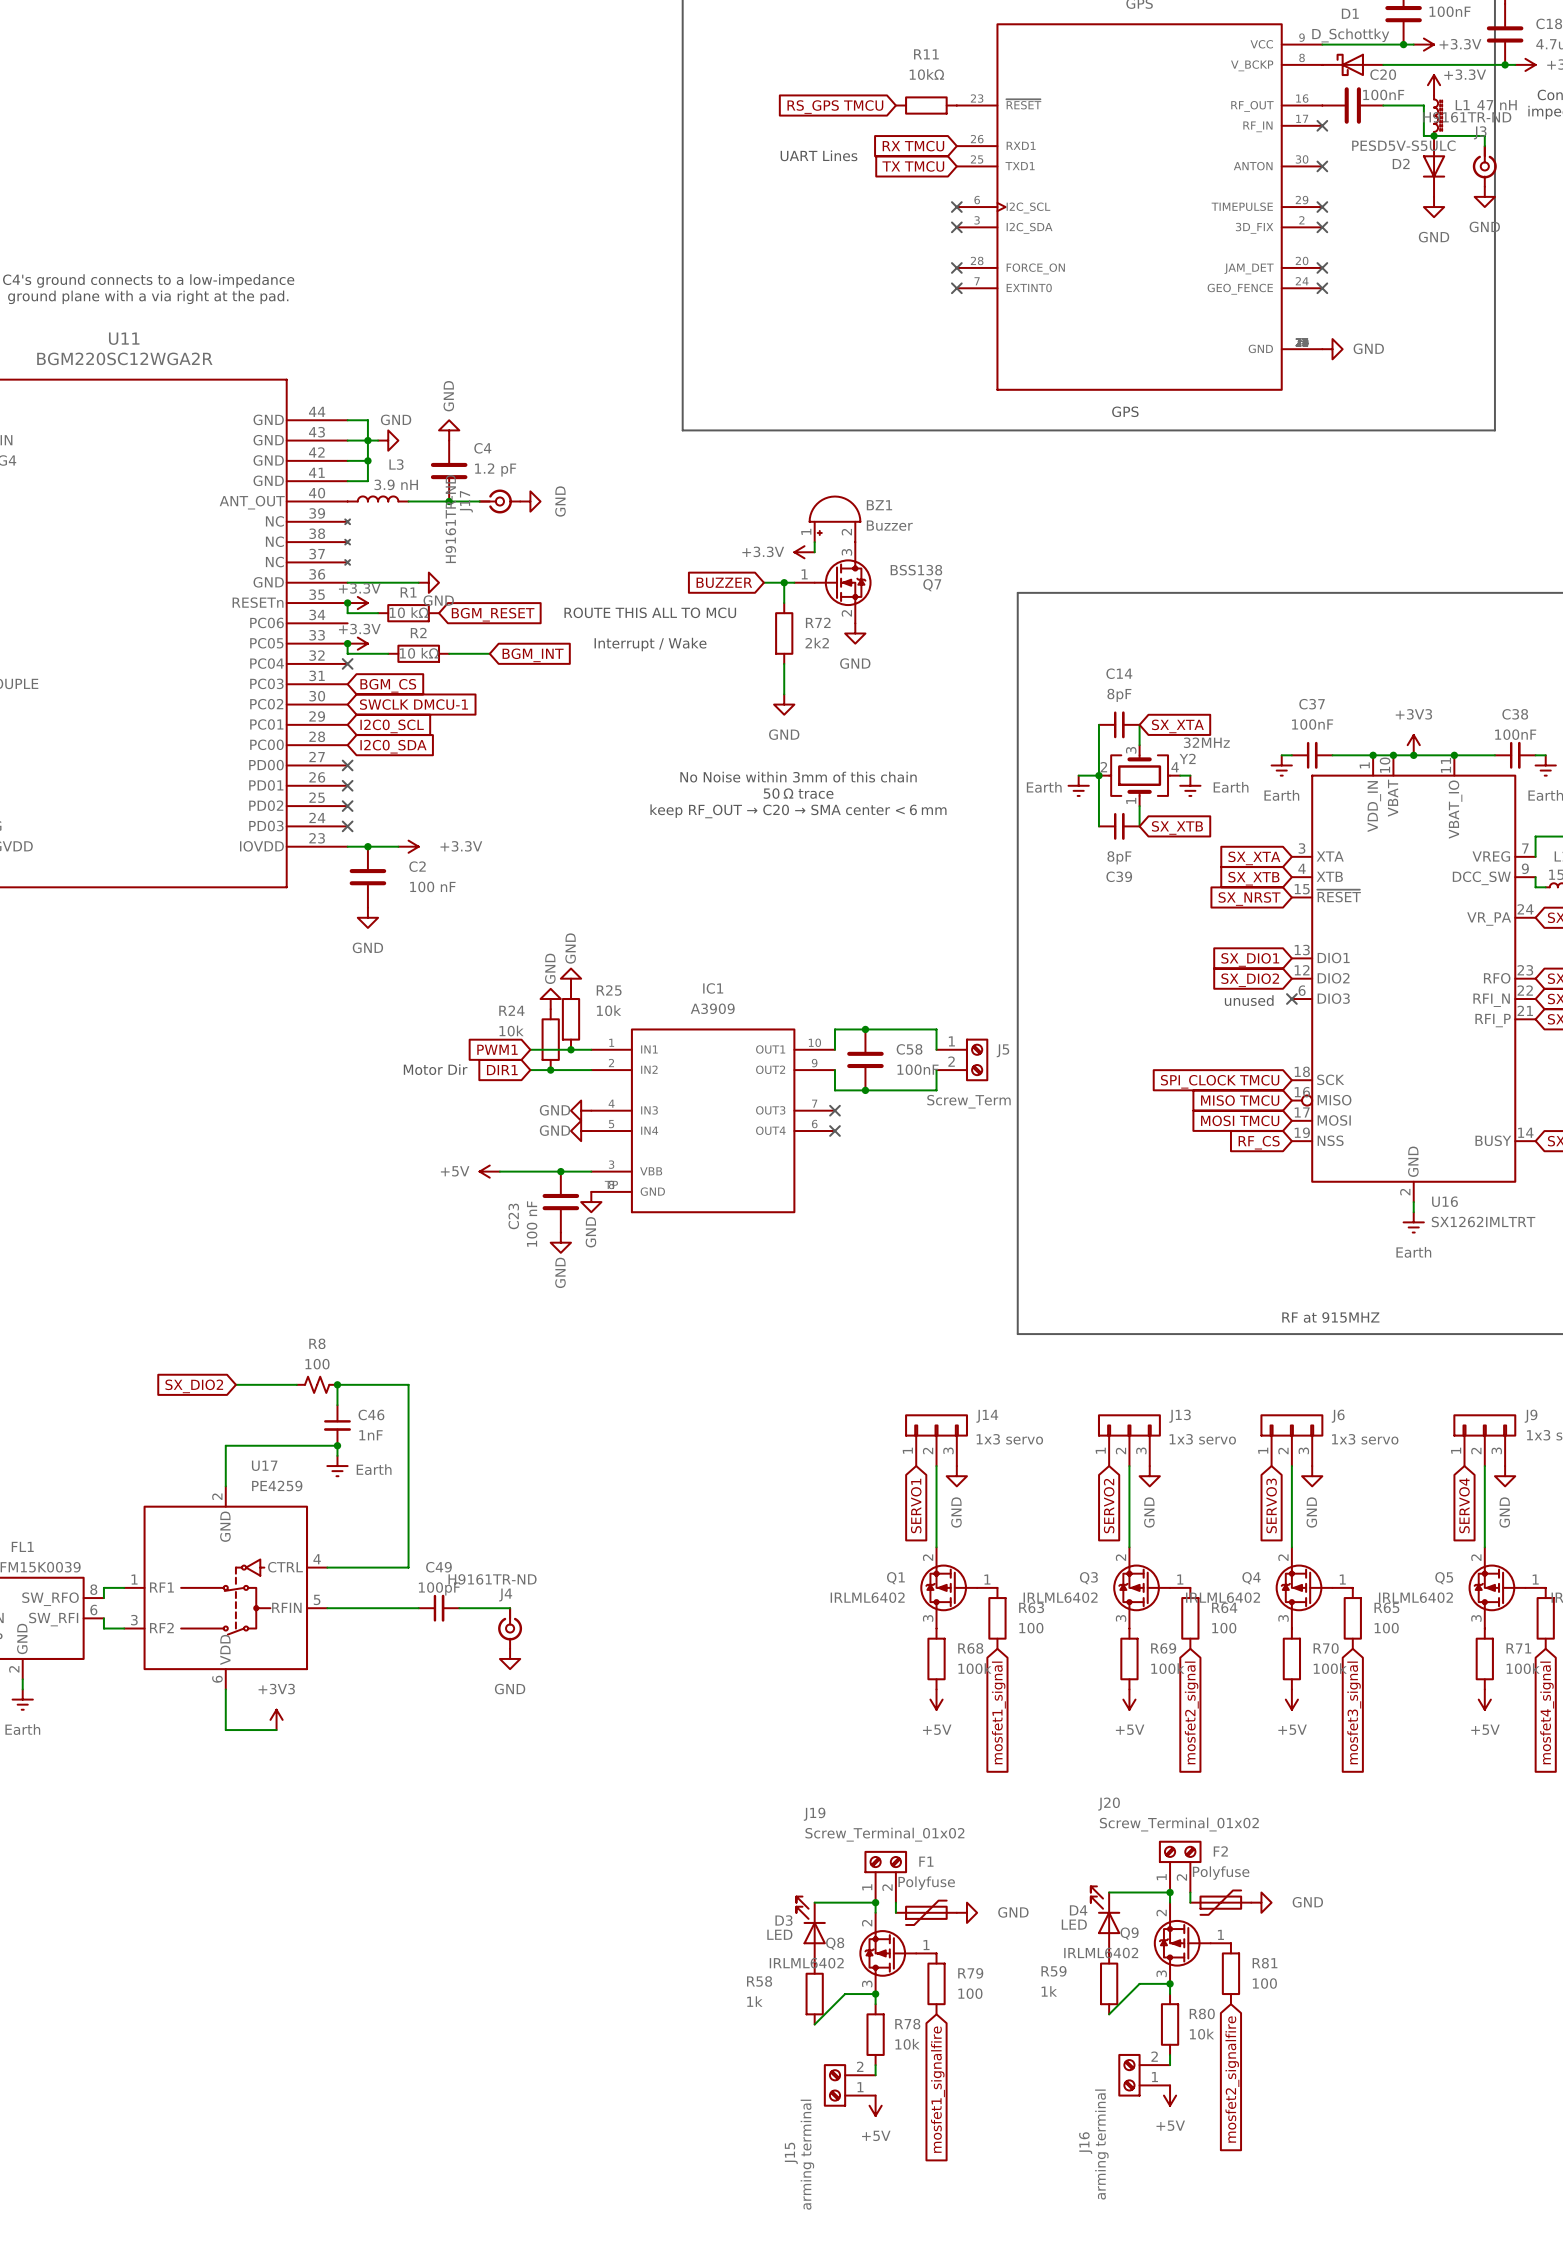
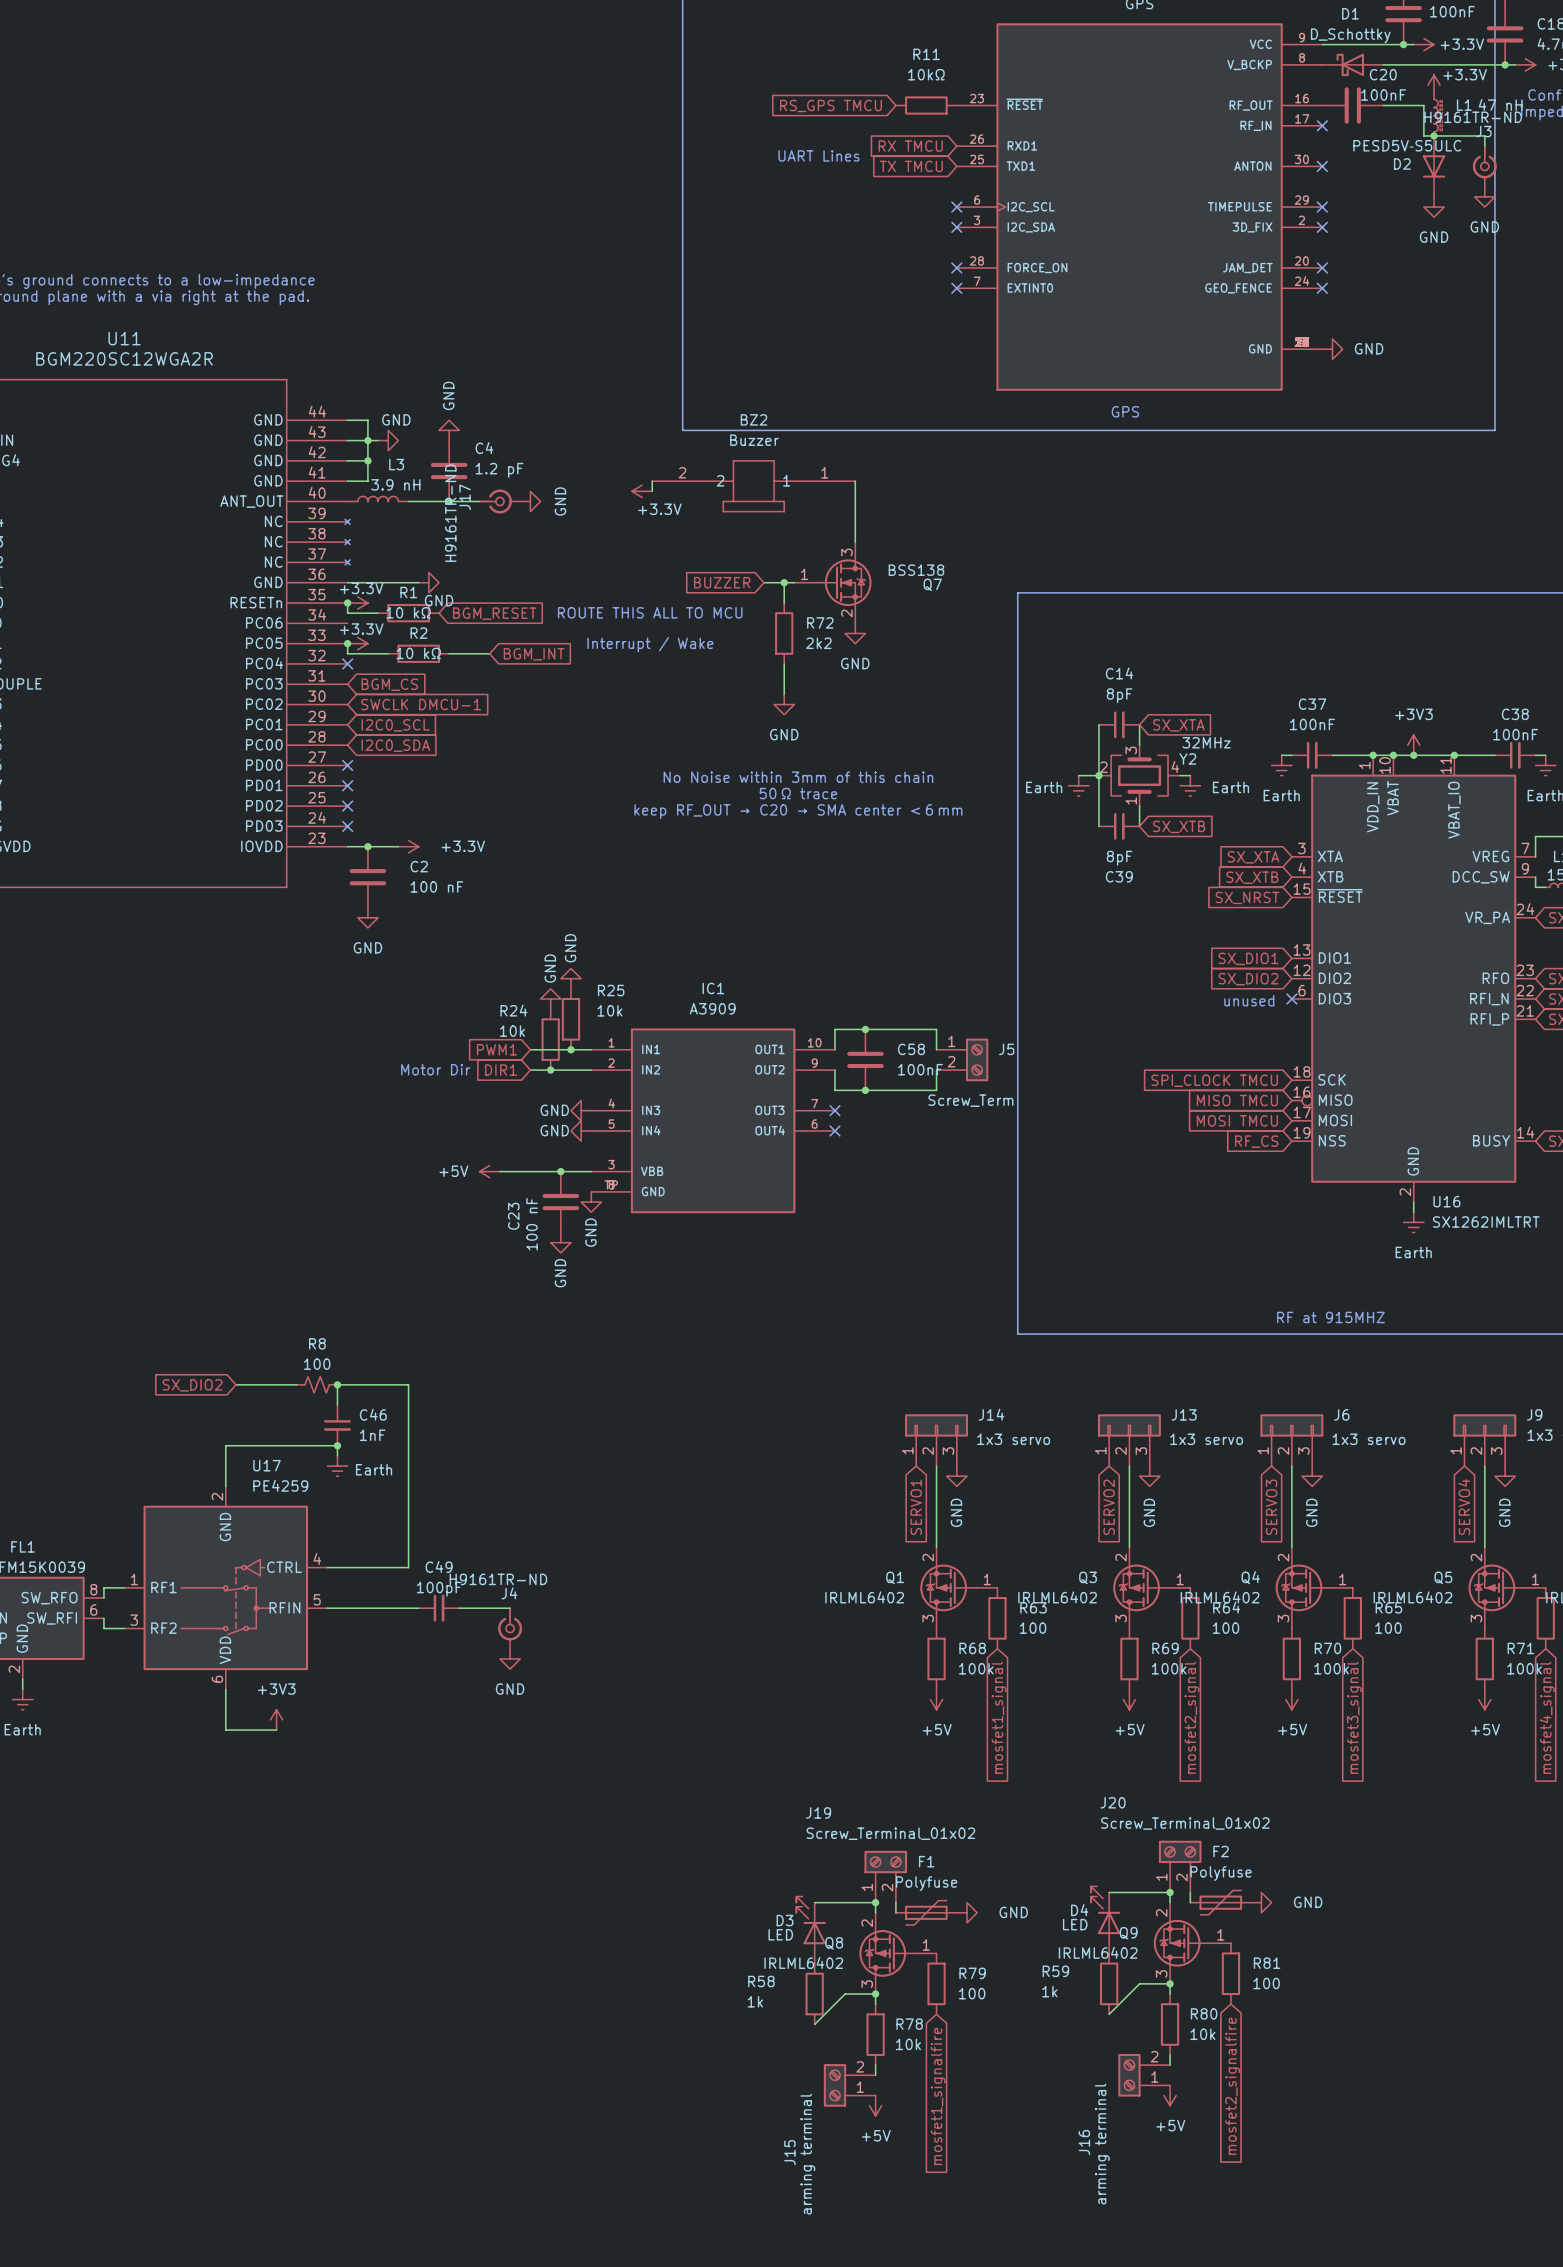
wire: none -> (855, 481) (855, 542)
BZ2: none -> Buzzer (753, 486)
BZ1: Buzzer (834, 519) -> none
wire: (814, 542) (814, 552) -> (652, 481) (652, 491)
power symbol text position: +3.3V (763, 551) -> +3.3V (659, 509)
power symbol position: +3.3V (804, 552) -> +3.3V (642, 491)

